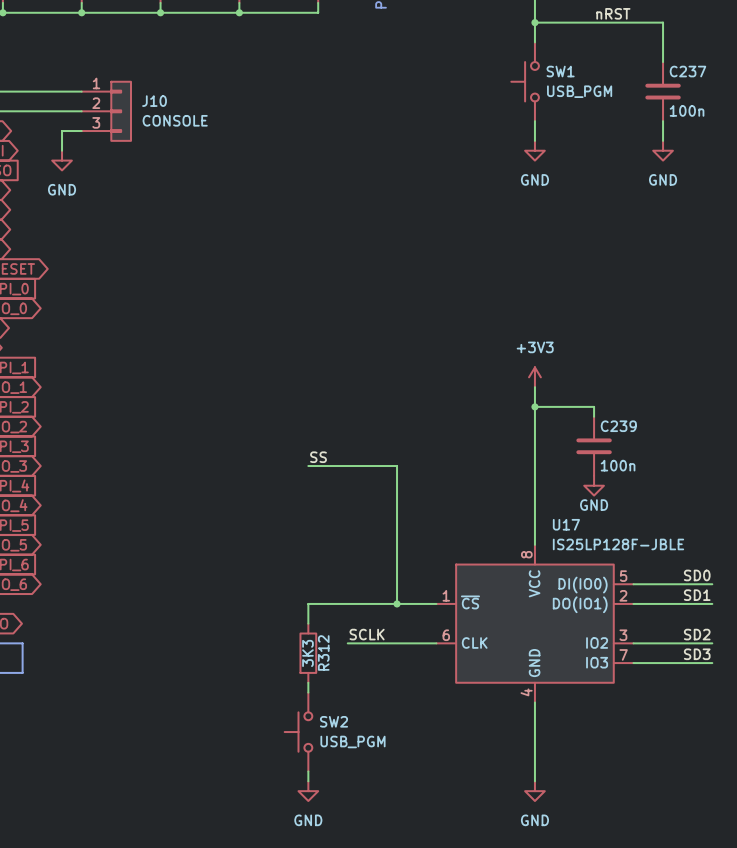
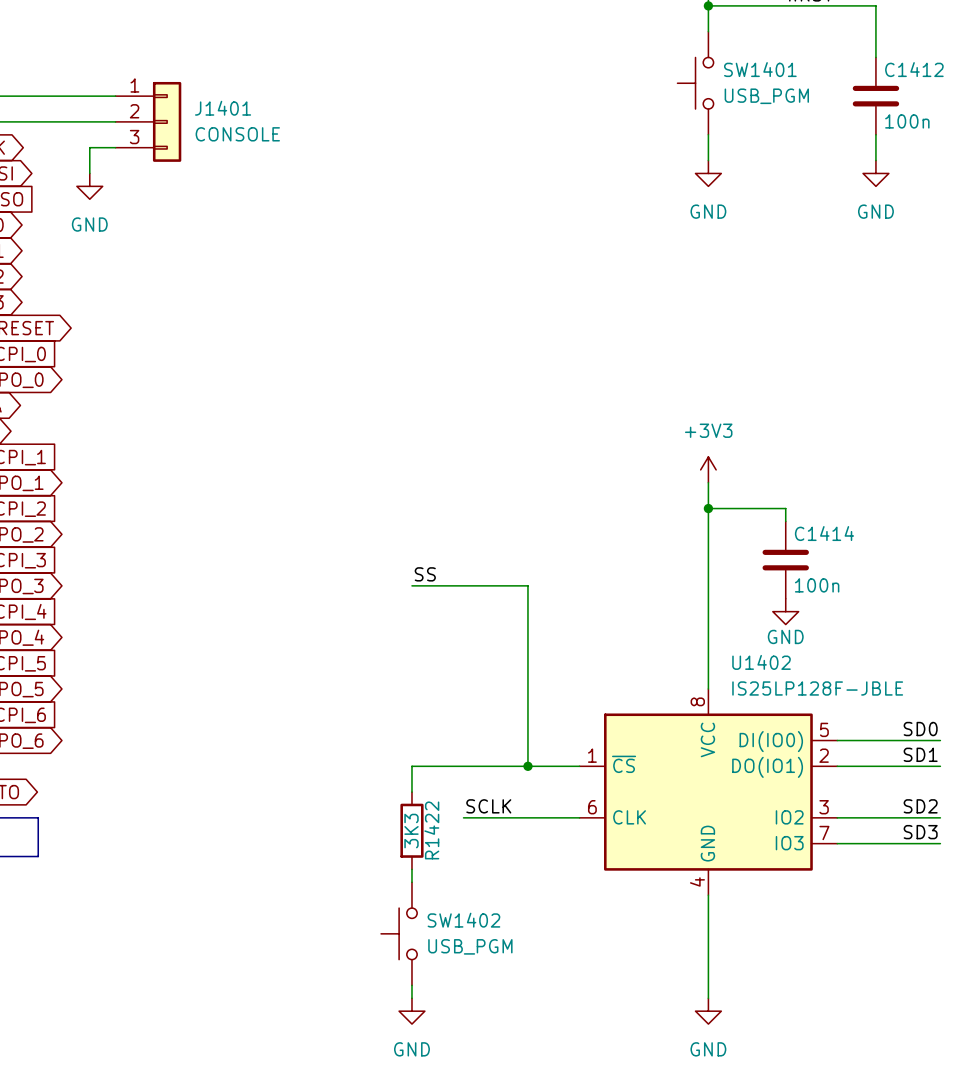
SW1 name: SW1 (560, 71) -> SW1401 (760, 69)
C237 name: C237 (687, 71) -> C1412 (914, 69)
J10 name: J10 (154, 101) -> J1401 (223, 108)
C239 name: C239 (618, 426) -> C1414 (824, 533)
U17 name: U17 (566, 524) -> U1402 (761, 662)
R312 name: R312 (323, 652) -> R1422 (431, 830)
SW2 name: SW2 (333, 721) -> SW1402 (463, 920)

